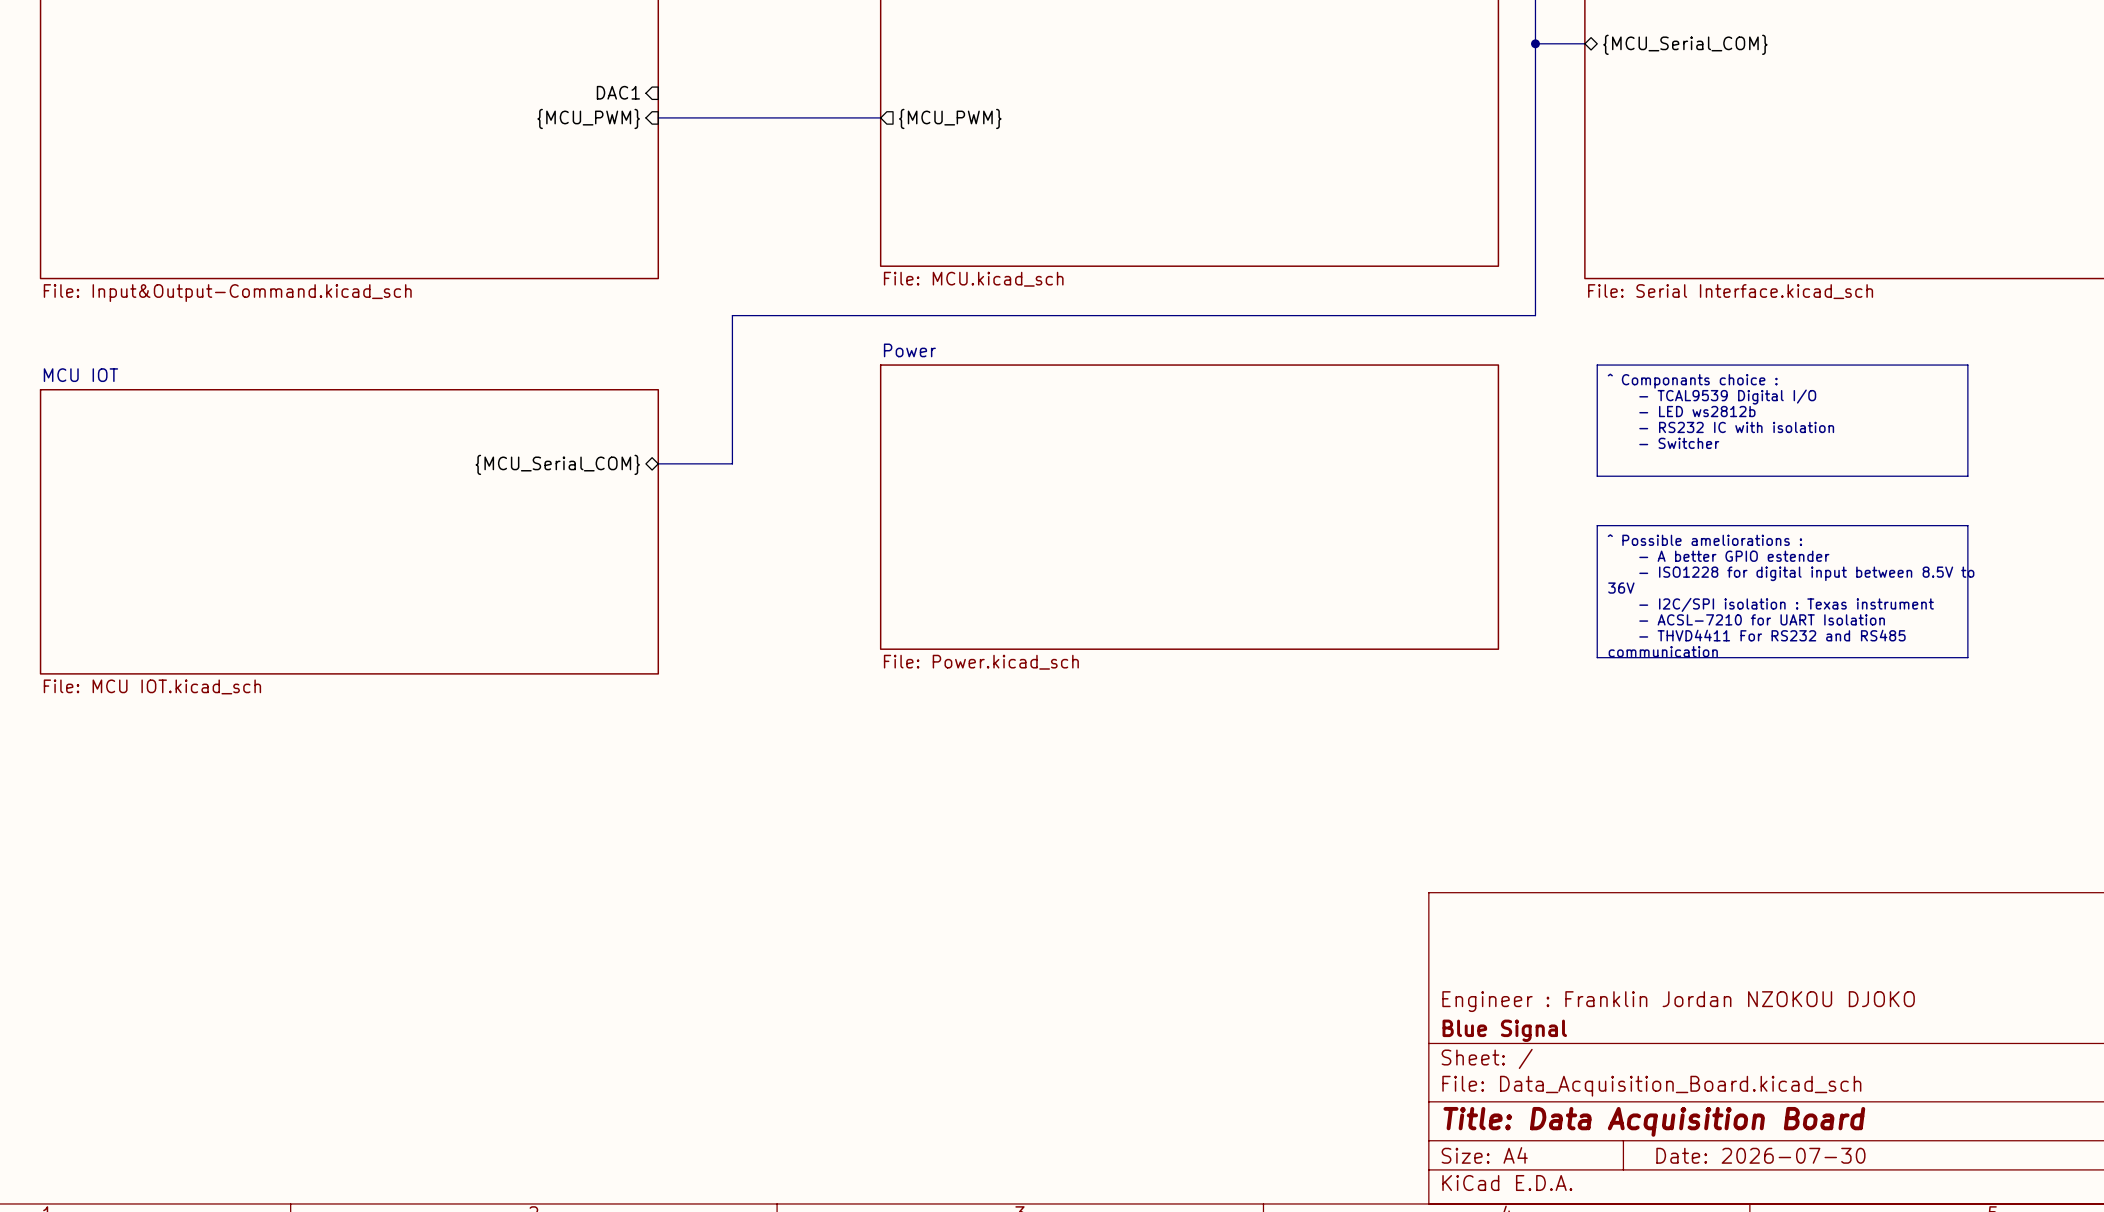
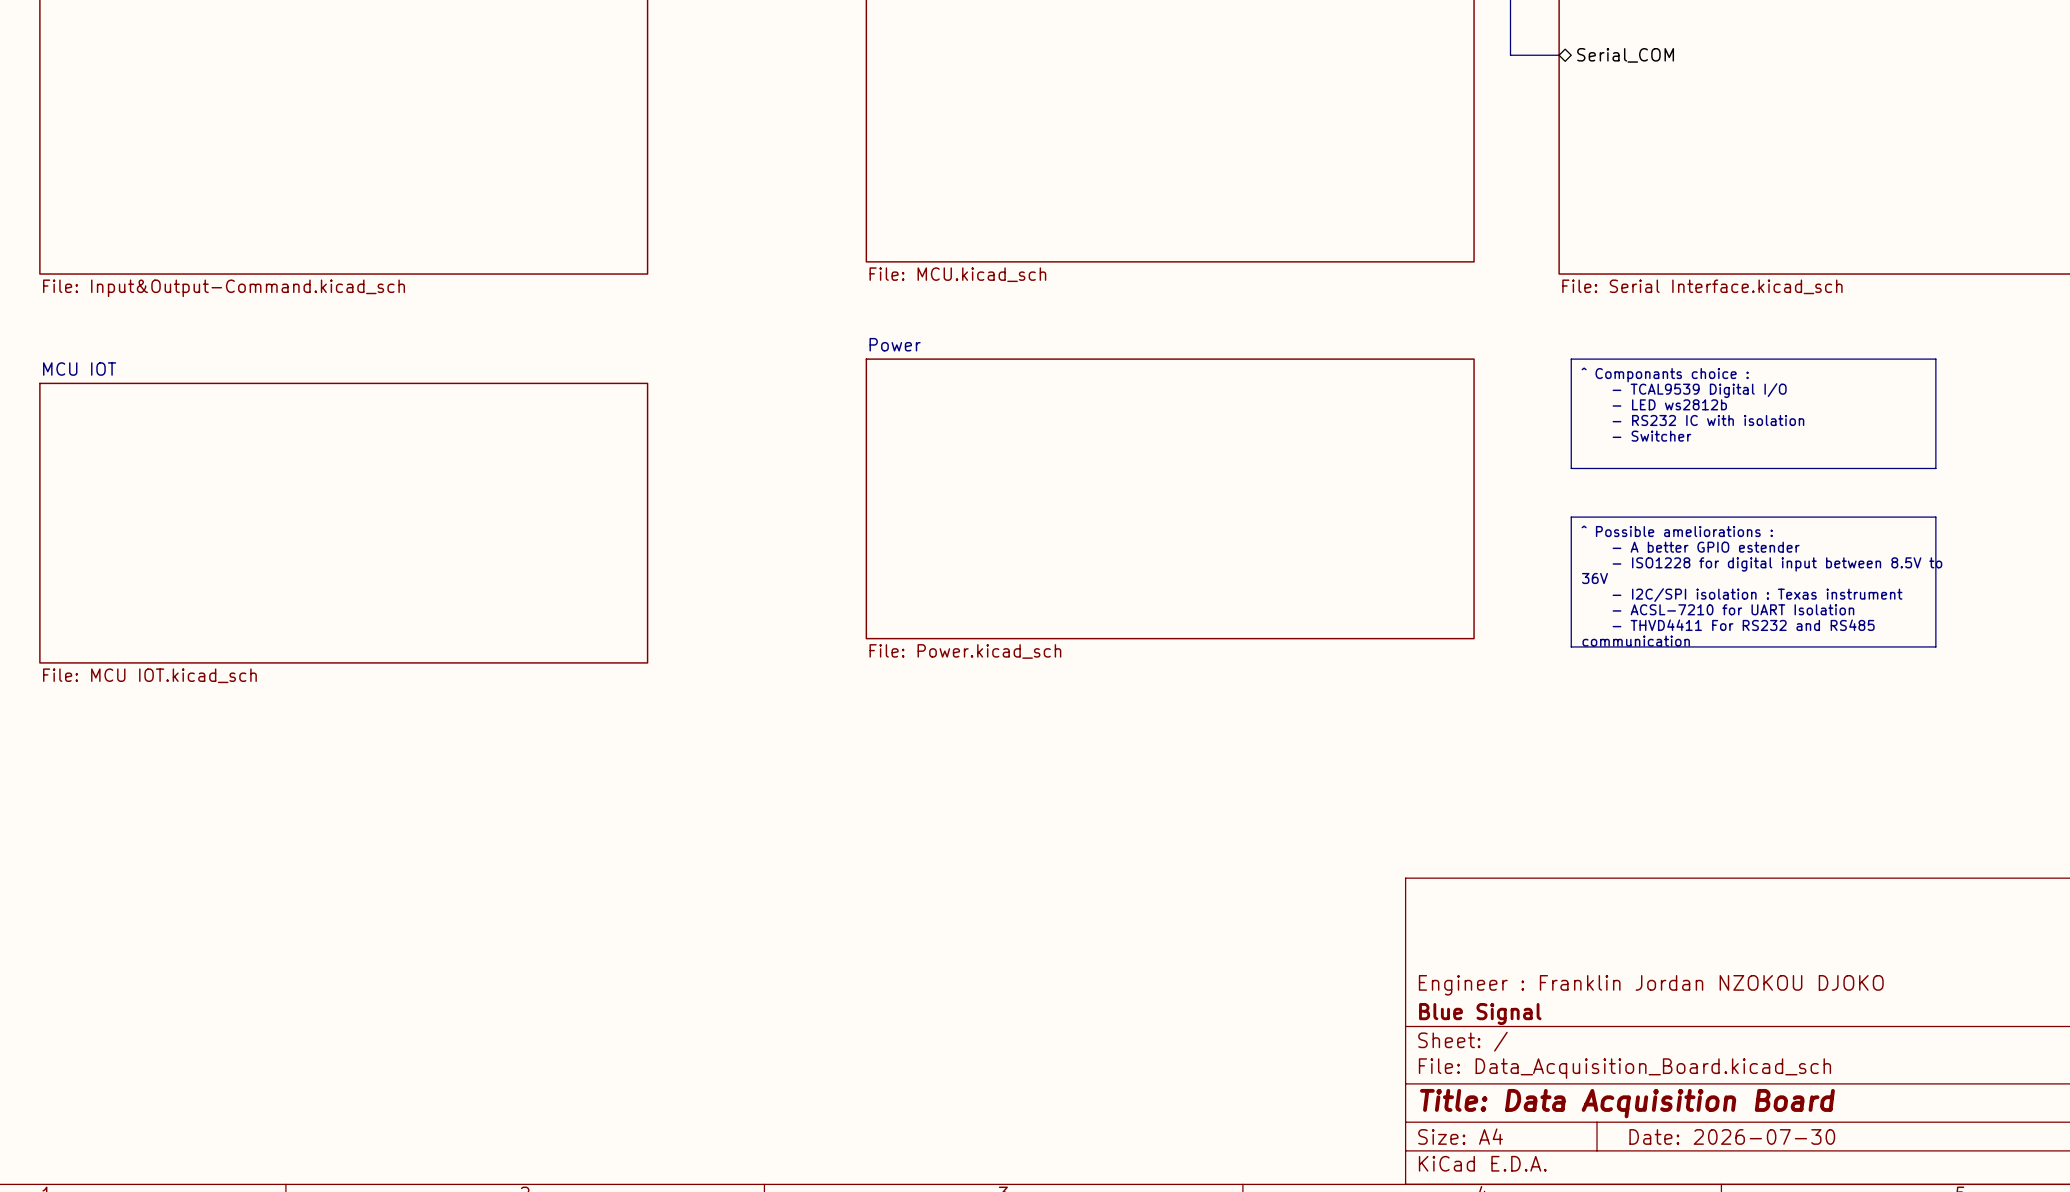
bus: (1535, 43) (1584, 43) -> none
junction: (1535, 43) -> none
sheet pin: {MCU_Serial_COM} (1685, 44) -> Serial_COM (1625, 55)
bus: (1535, 56) (1535, 315) (732, 315) (732, 463) (658, 463) -> (1510, 55) (1559, 55)
sheet pin: DAC1 (618, 92) -> none
bus: (658, 117) (880, 117) -> none
sheet pin: {MCU_PWM} (588, 118) -> none
sheet pin: {MCU_PWM} (950, 118) -> none
sheet pin: {MCU_Serial_COM} (557, 464) -> none

